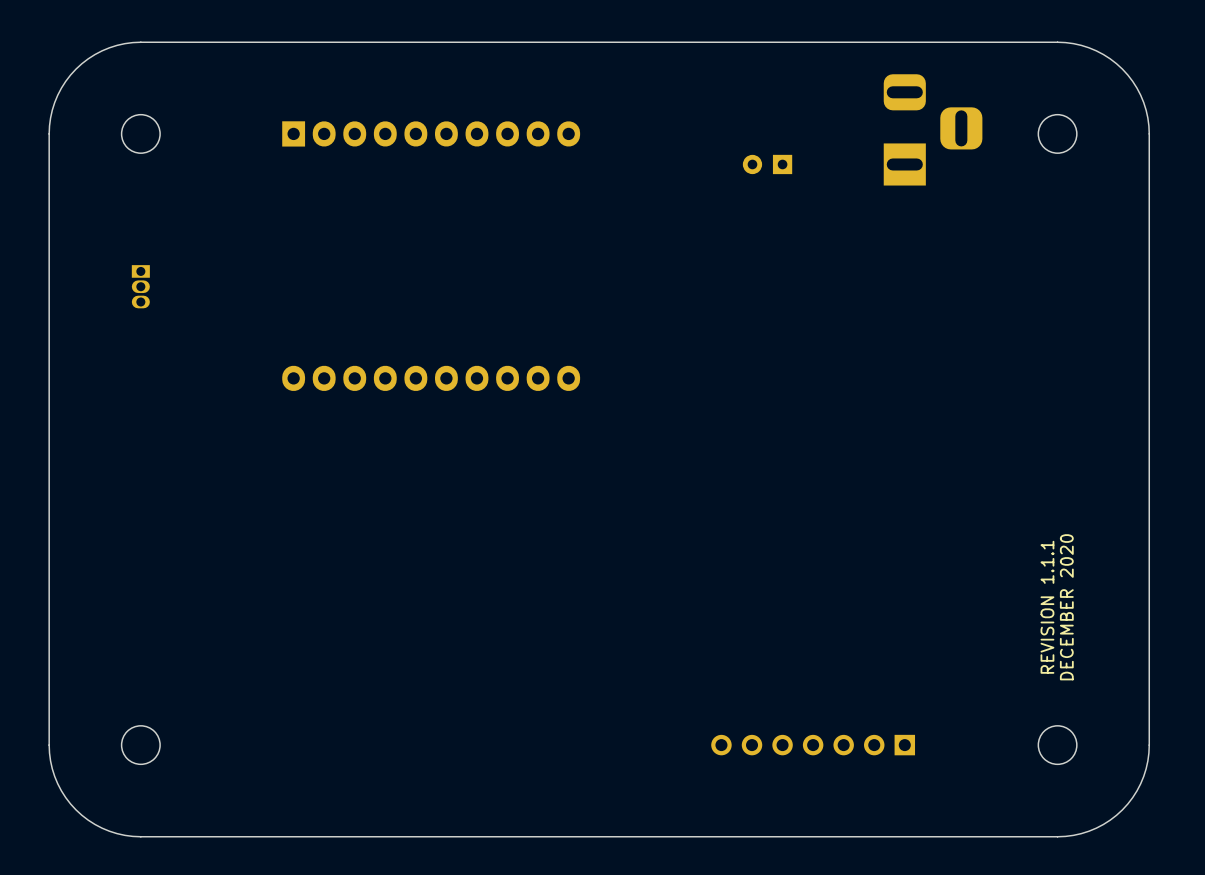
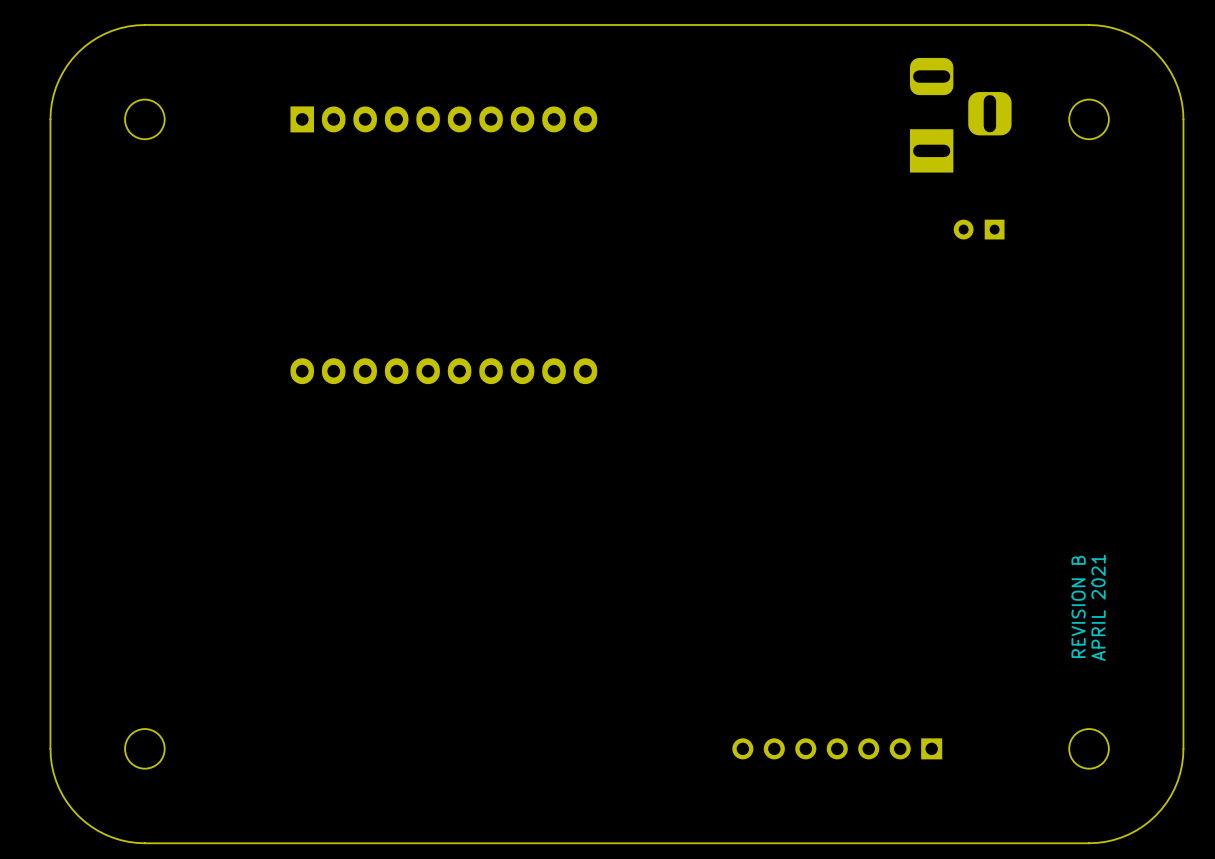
part position: (767, 164) -> (979, 229)
part: (140, 286) -> none
text: REVISION 1.1.1 (1047, 607) -> REVISION B (1078, 606)
text: DECEMBER 2020 (1066, 607) -> APRIL 2021 (1098, 607)

